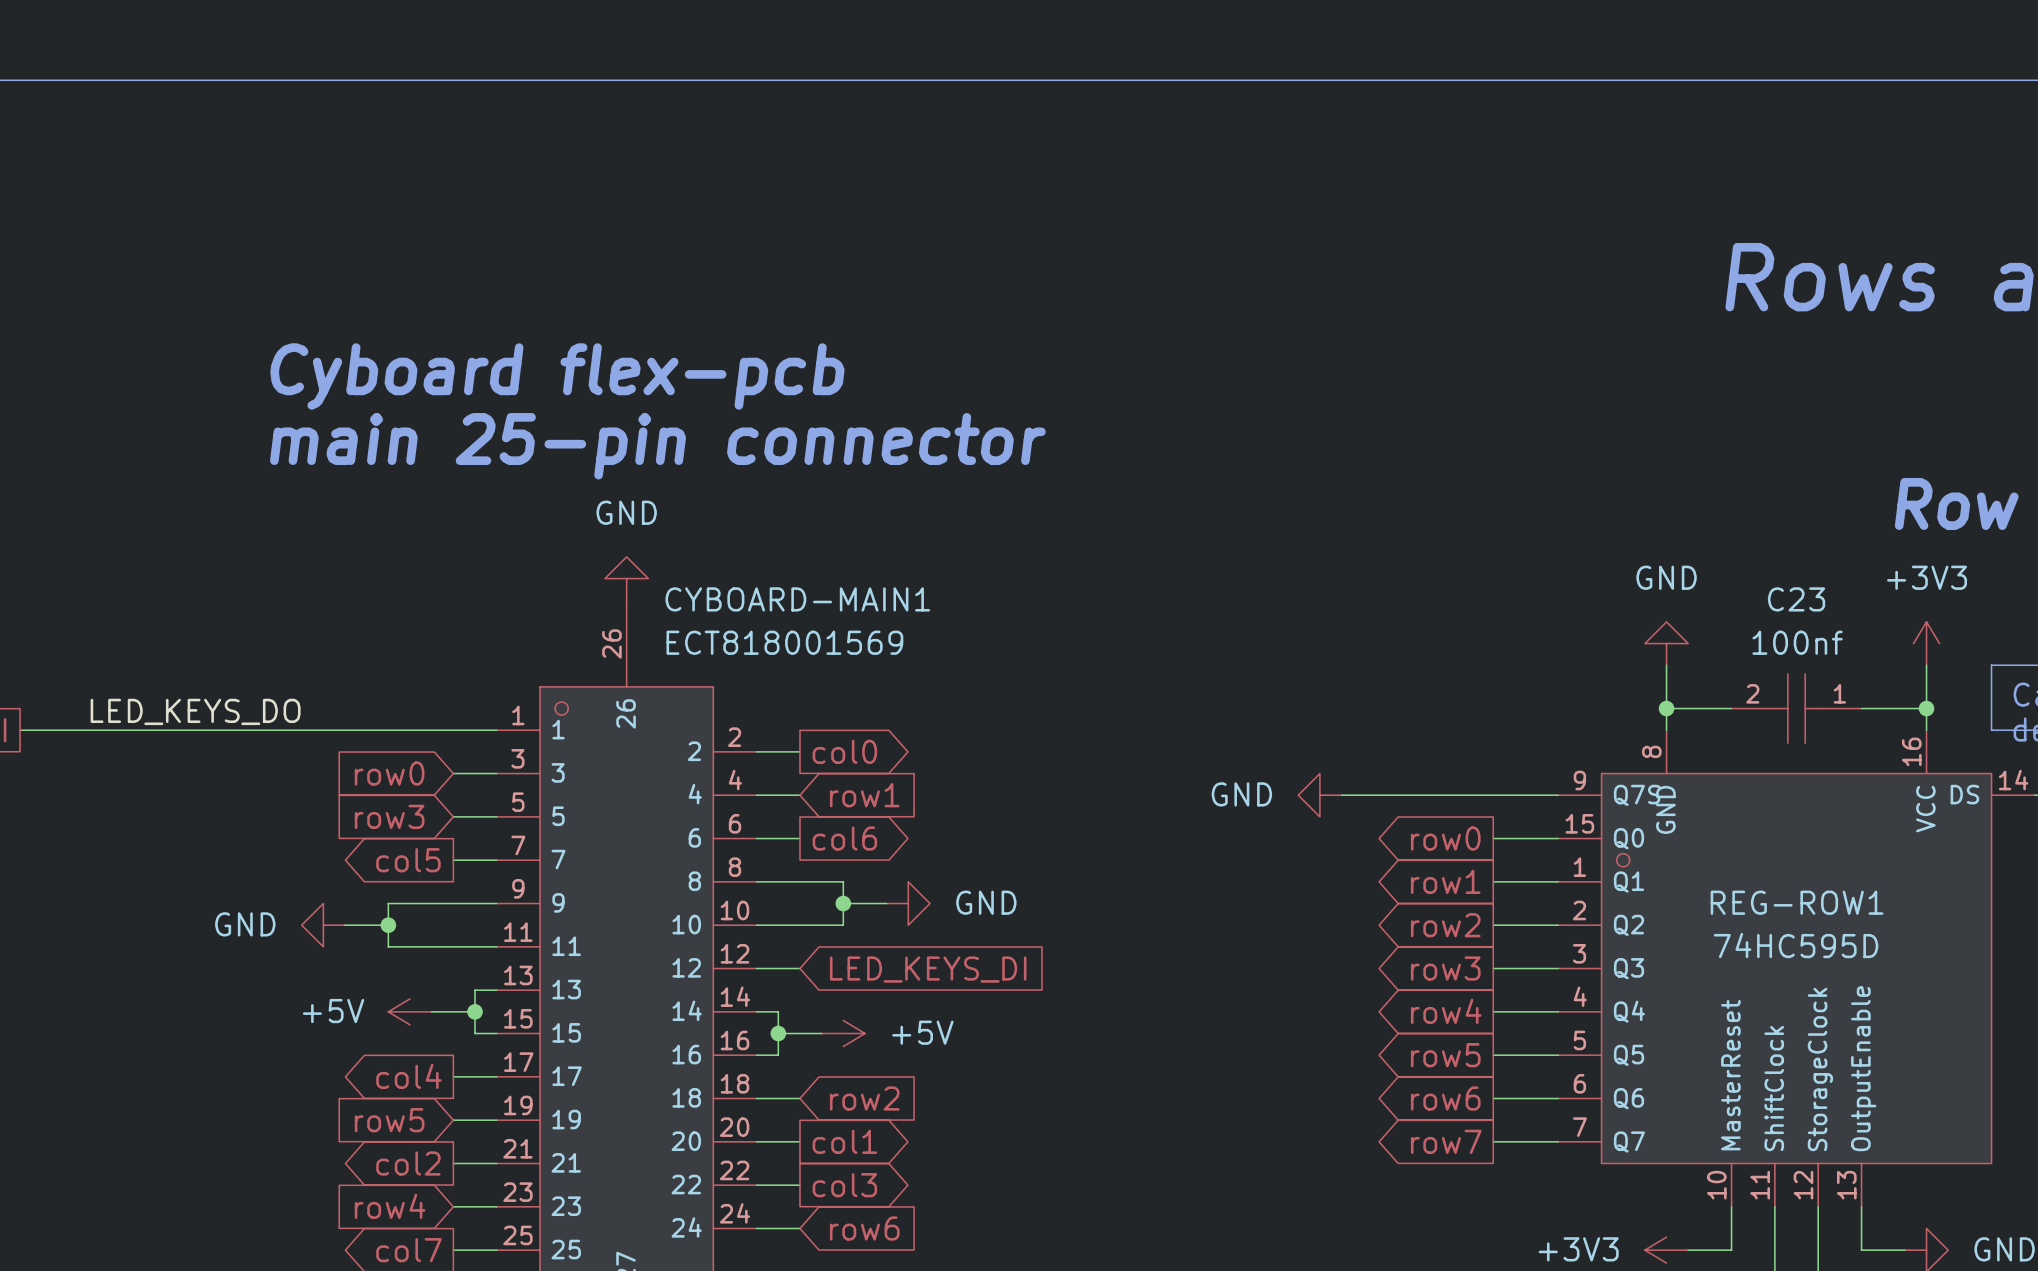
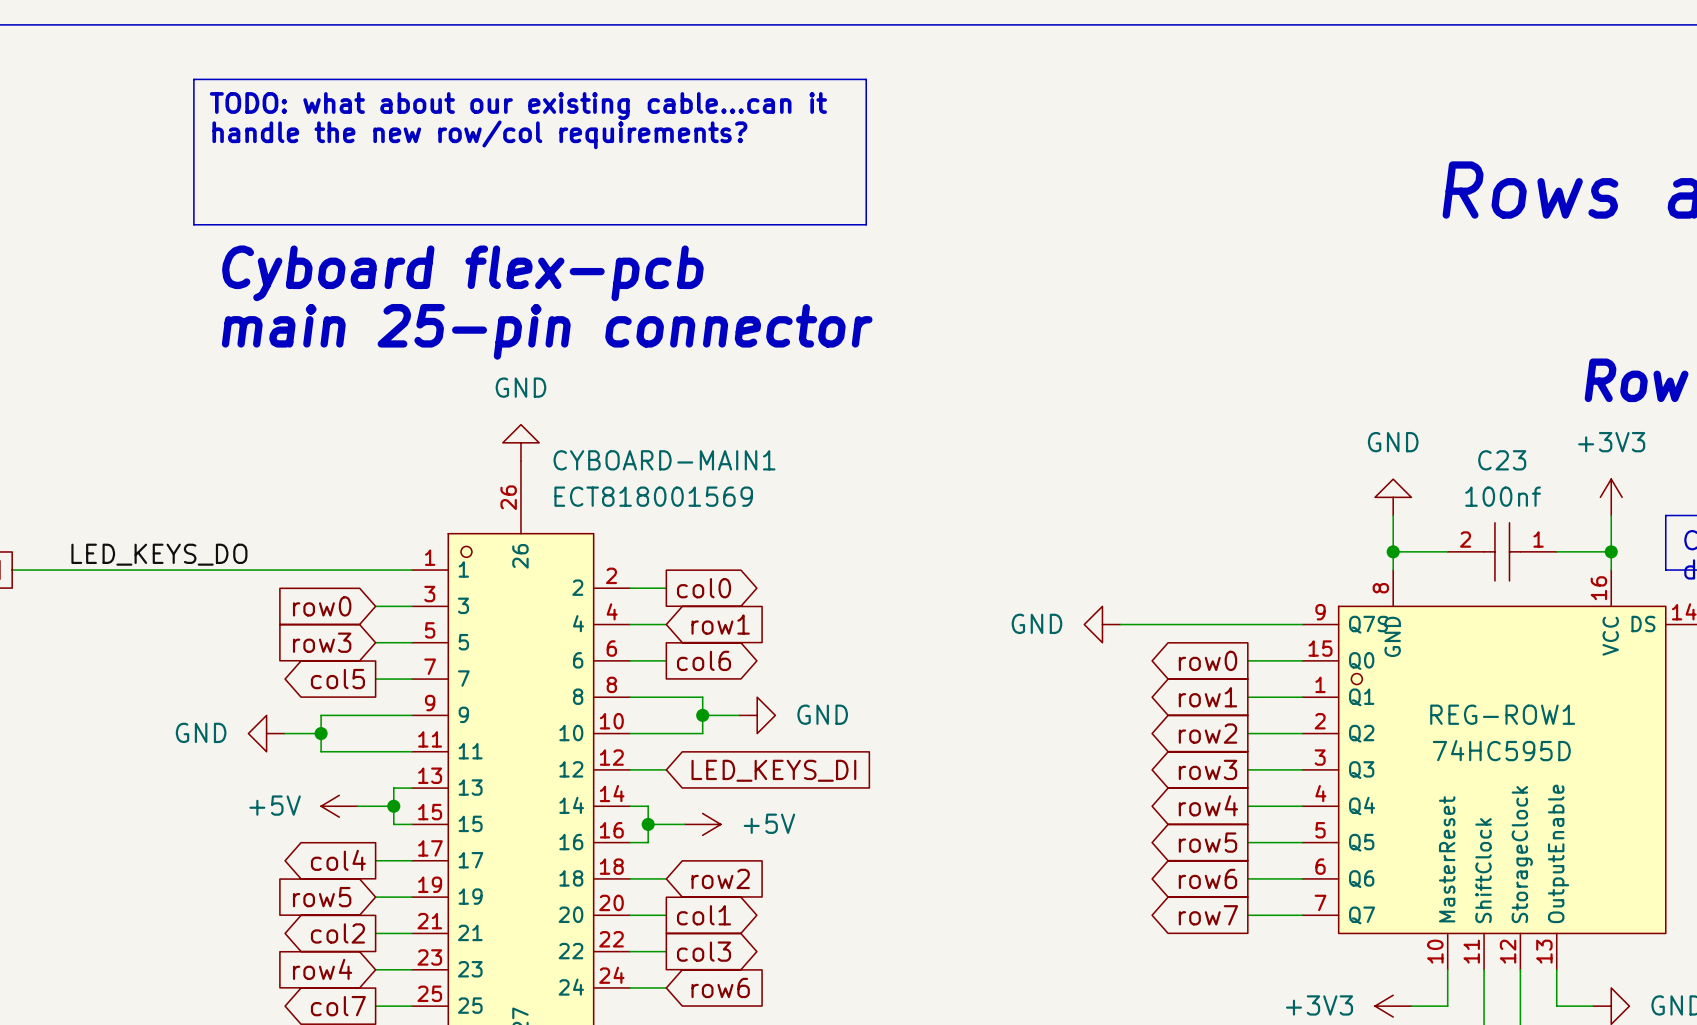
line: none -> (193, 79) (866, 79) (866, 224) (193, 224) (193, 79)
text: none -> TODO: what about our existing cable...can it (518, 106)
text: none -> handle the new row/col requirements? (479, 134)

